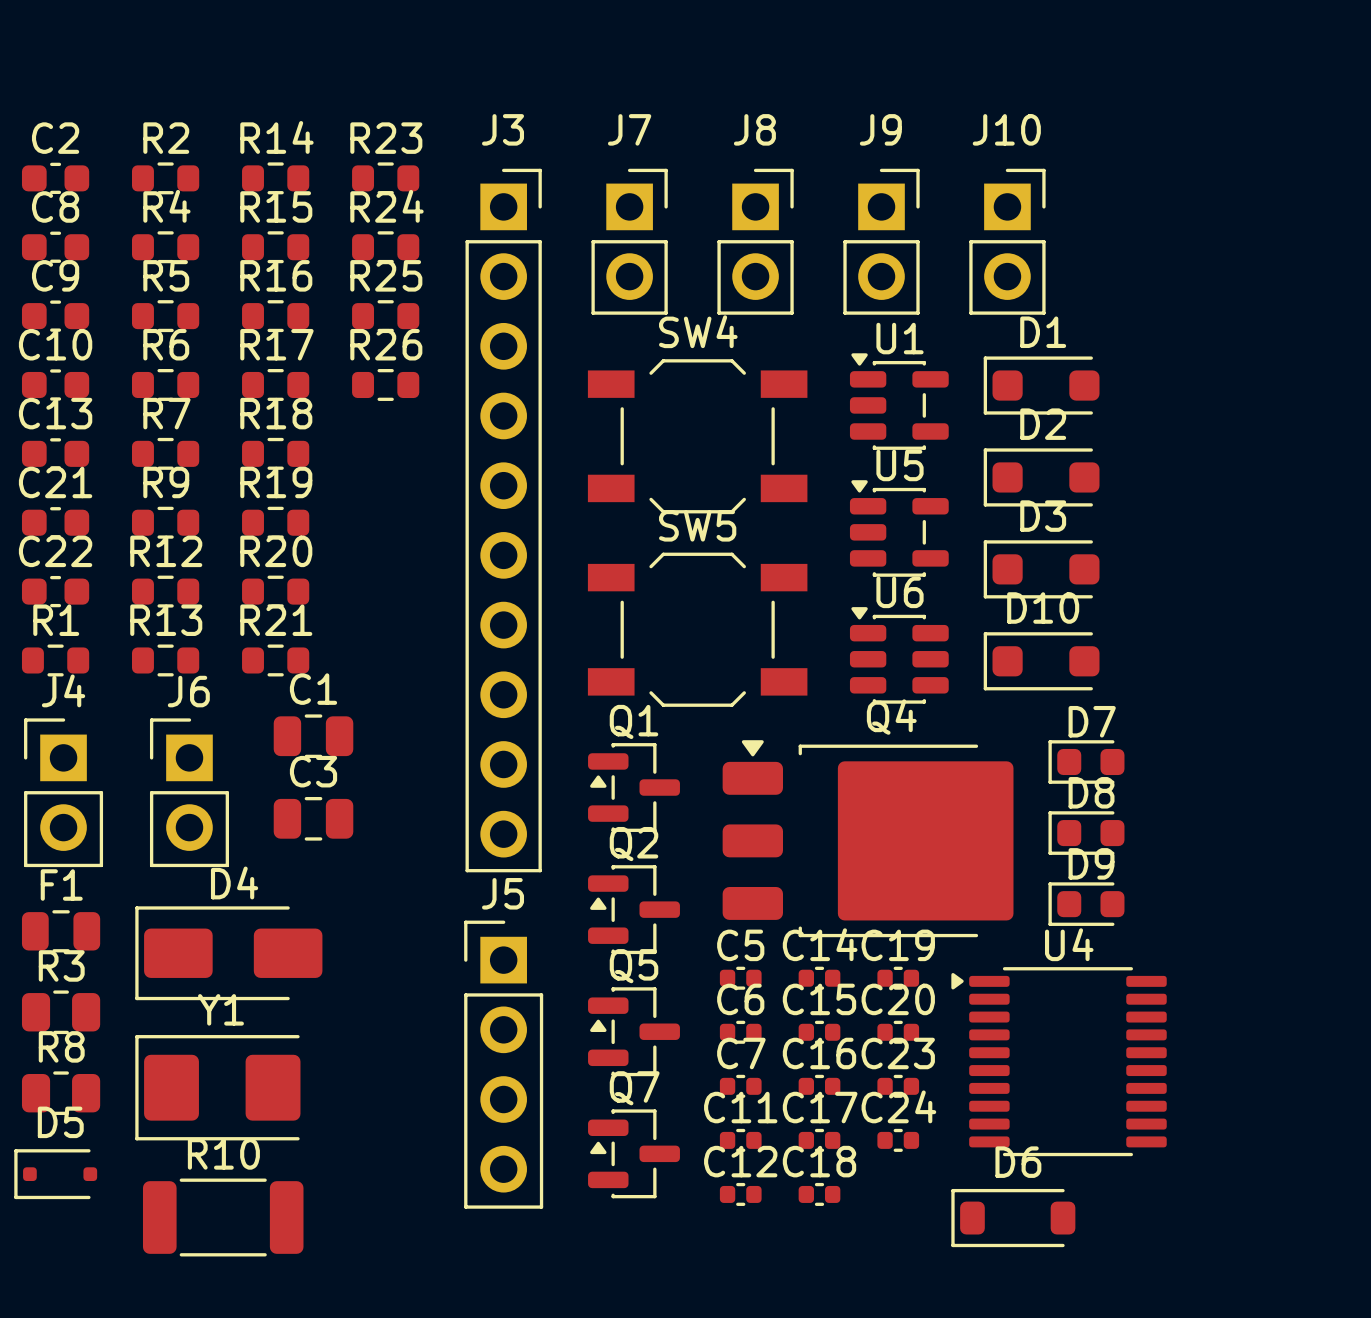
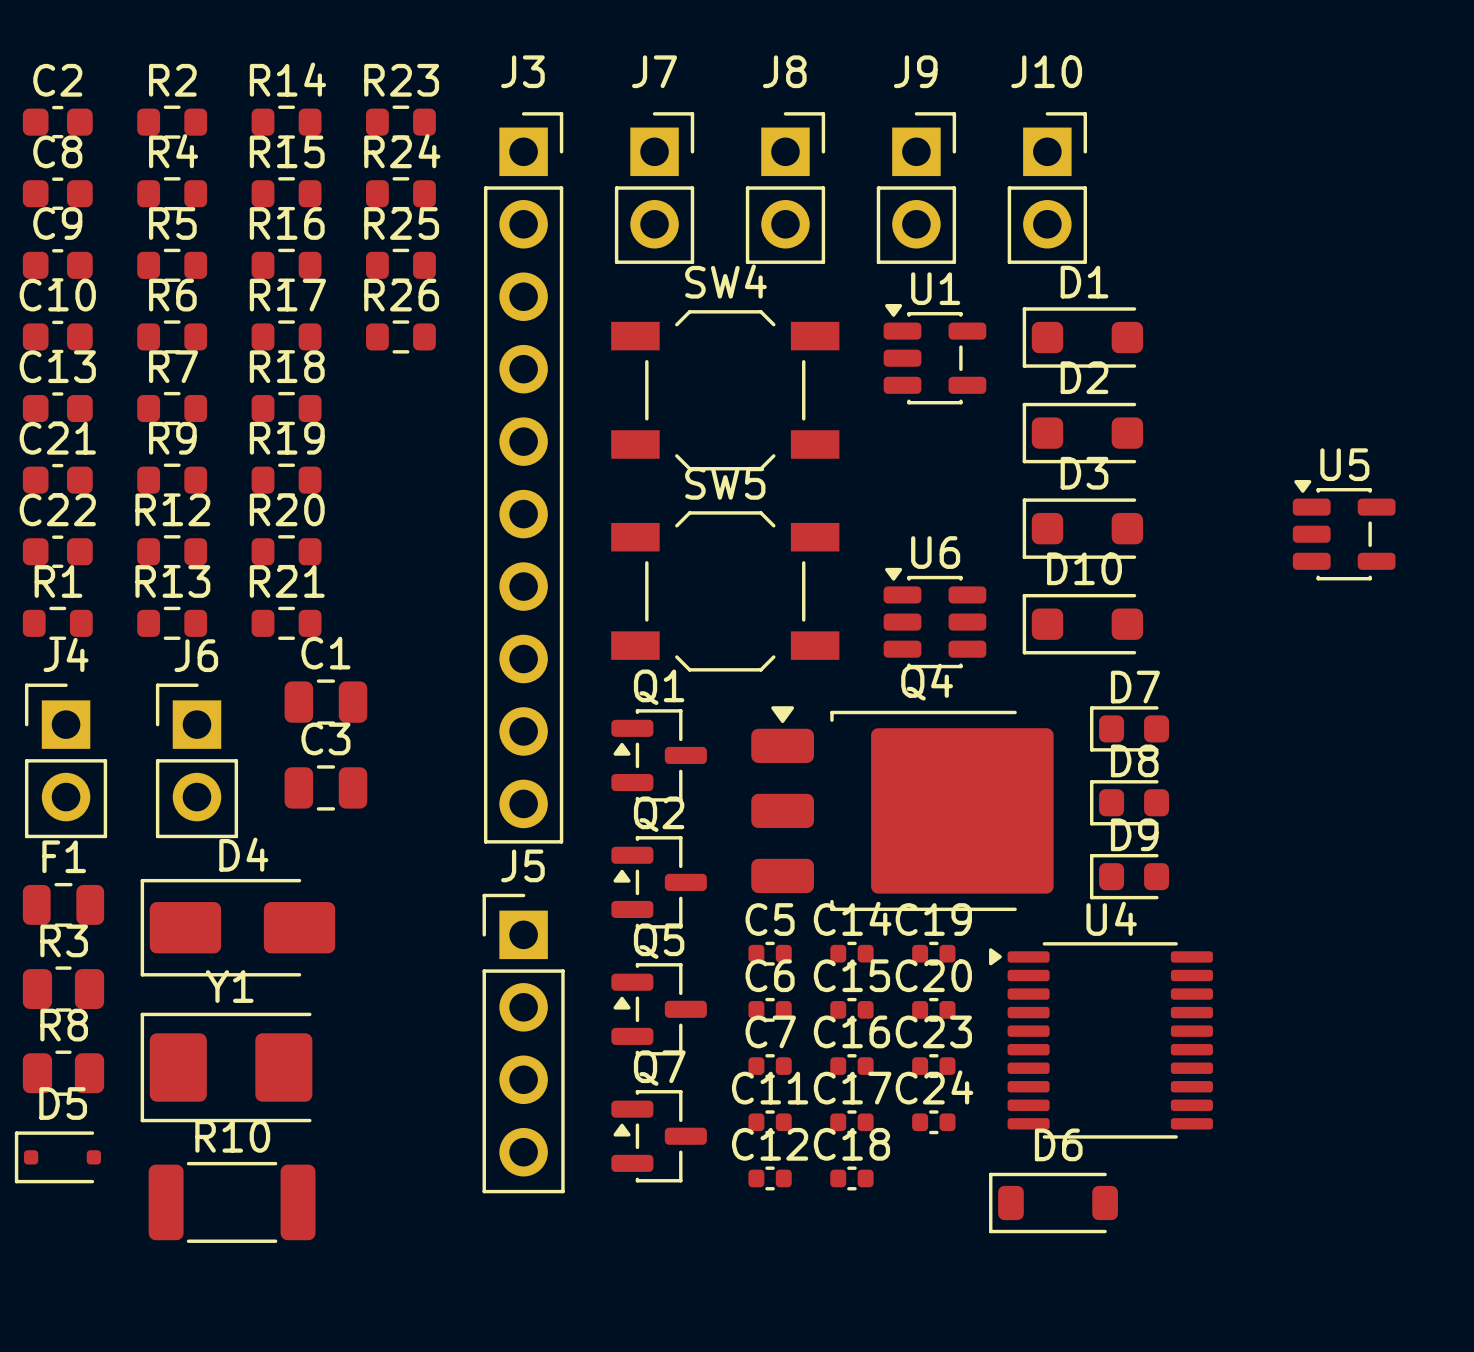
U5 position: (899, 528) -> (1344, 530)

